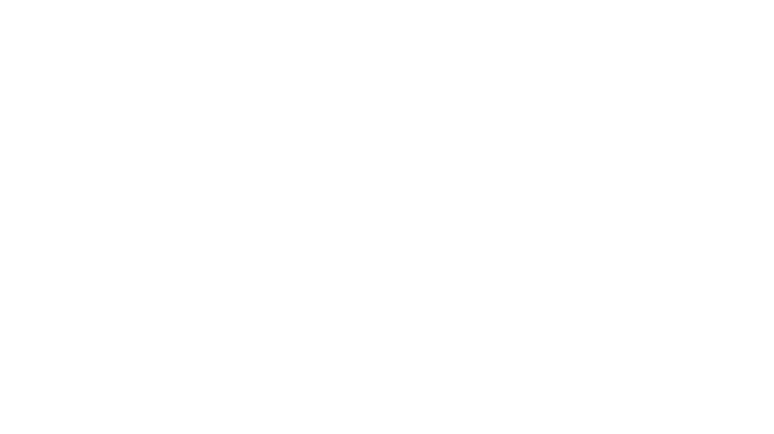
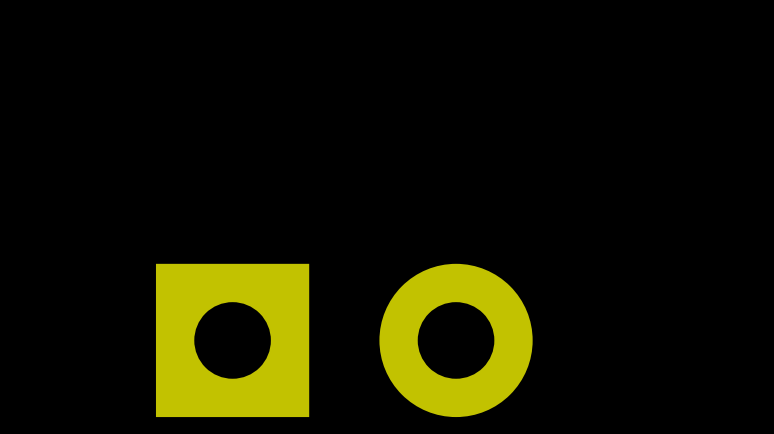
part: none -> (344, 340)

